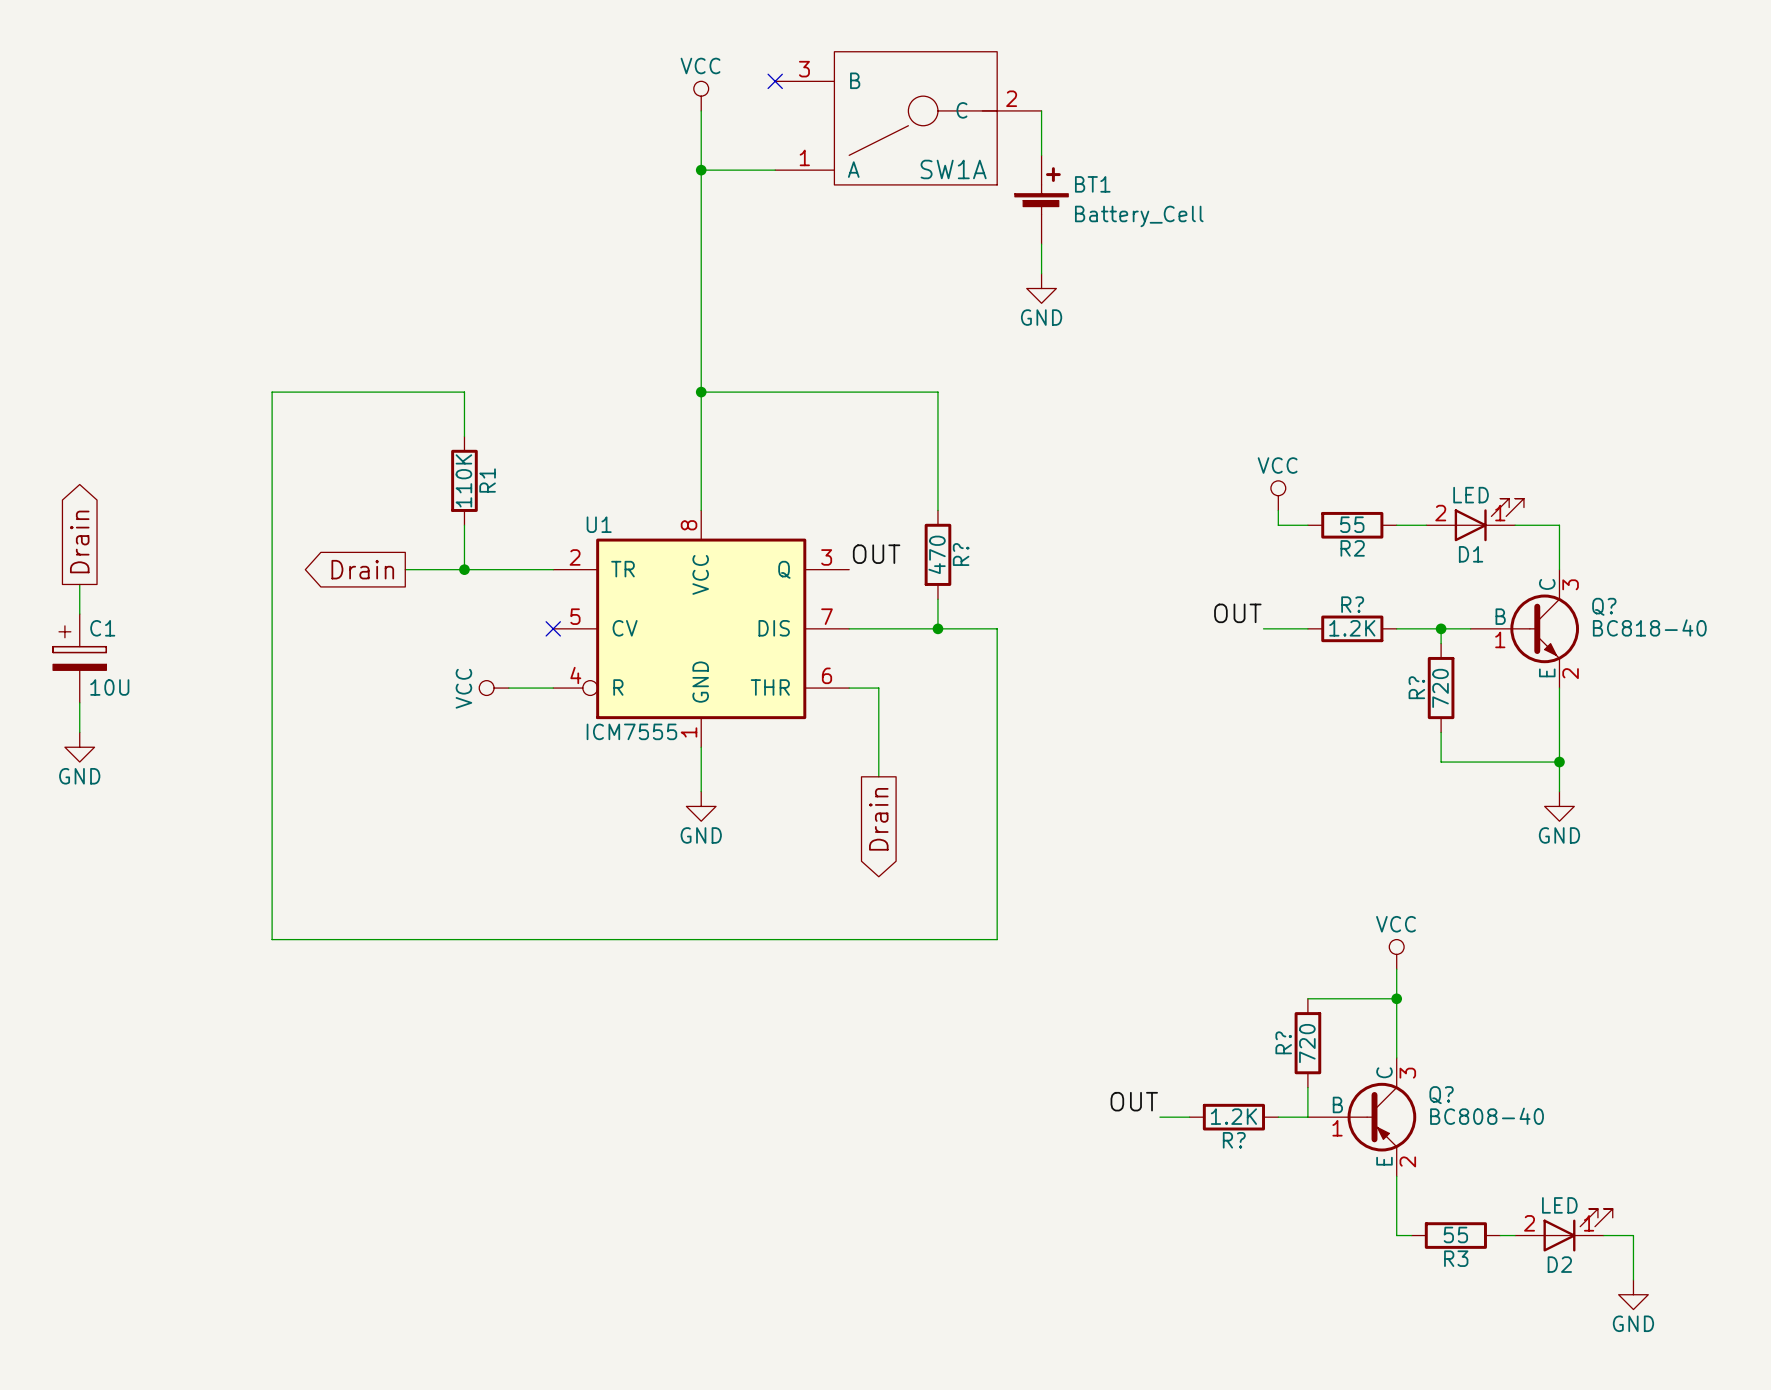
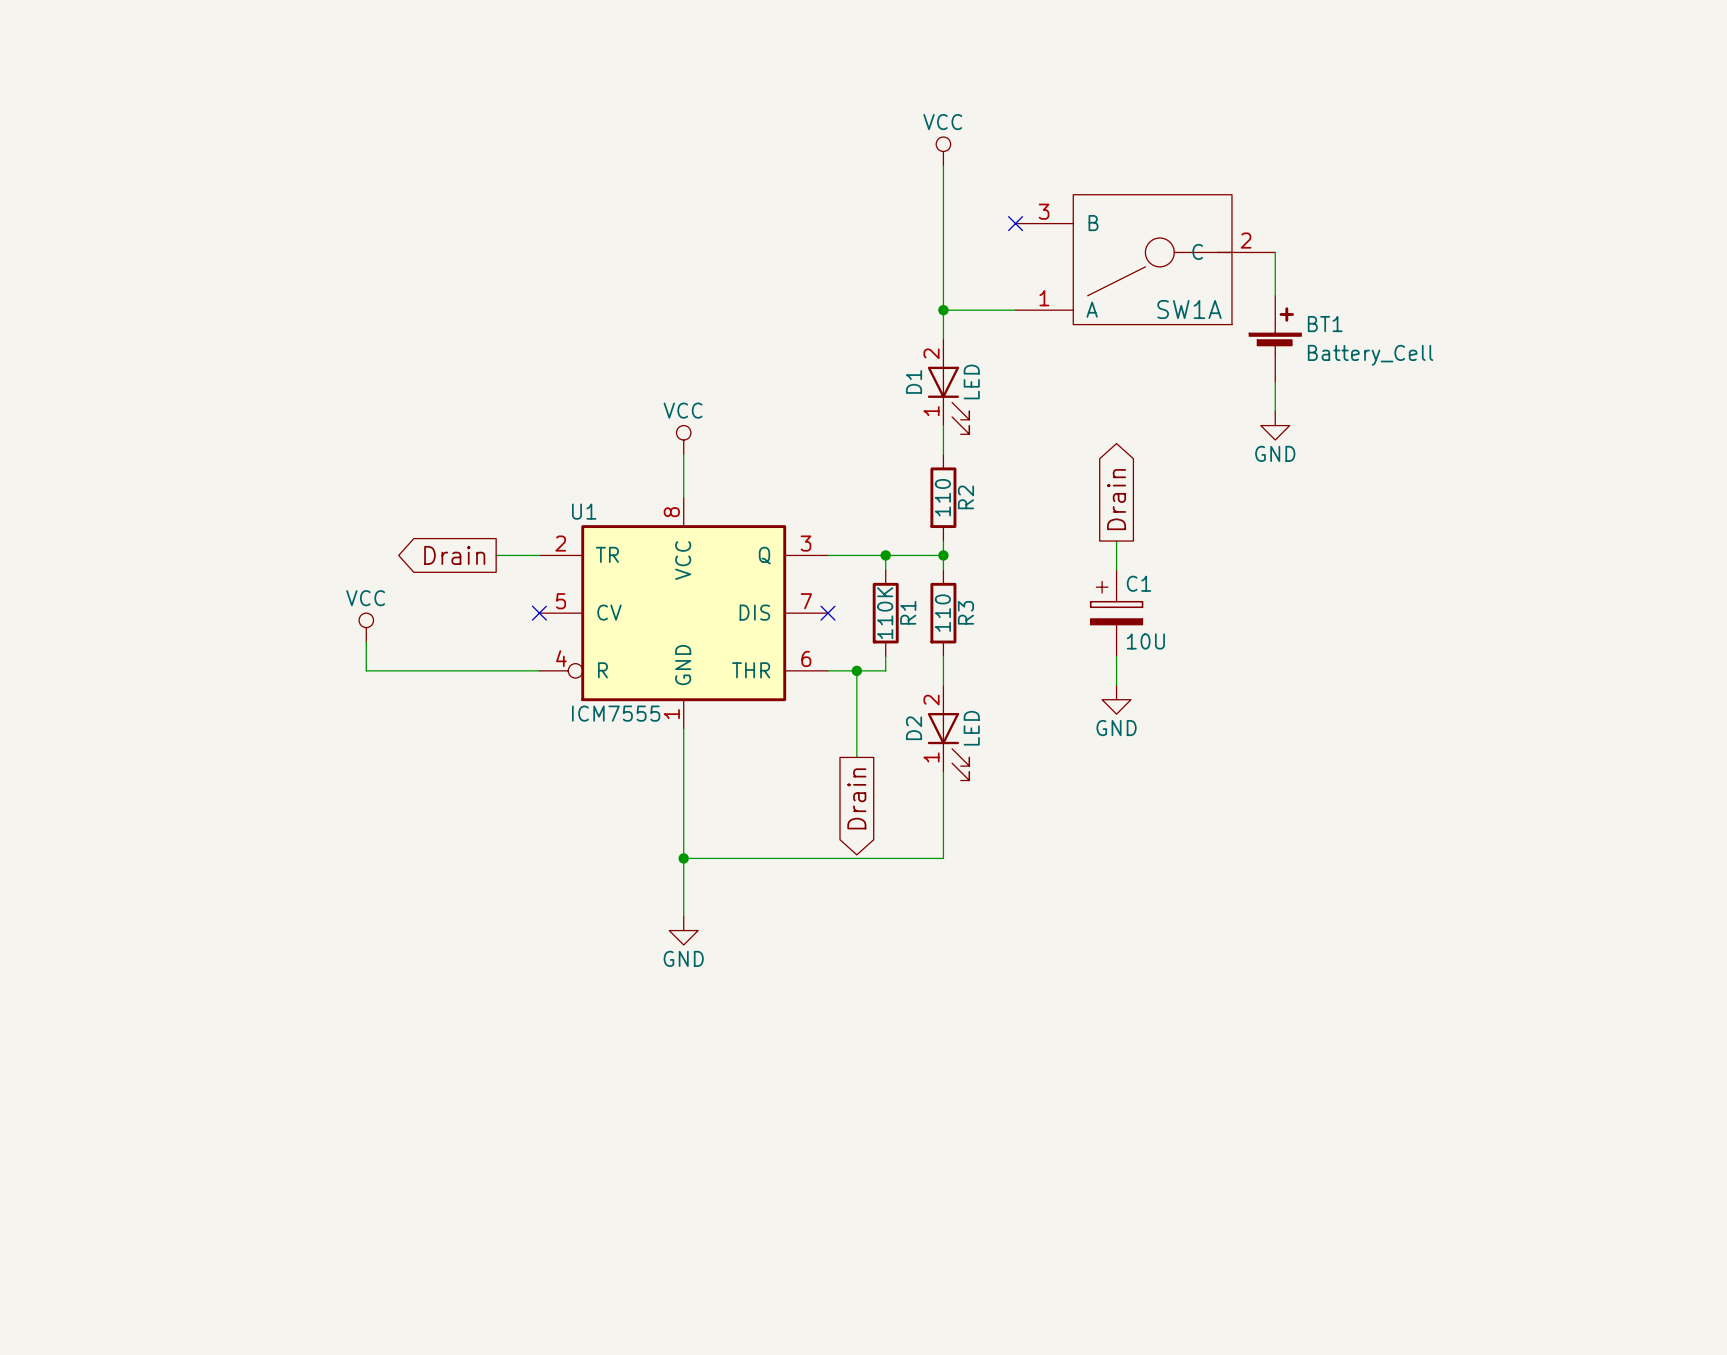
no-connect mark: (775, 81) -> none
power symbol: VCC (701, 96) -> none
wire: (701, 110) (701, 466) -> none
wire: (1041, 110) (1041, 155) -> none
SW1A position: (908, 118) -> (1145, 259)
power symbol: none -> VCC (943, 151)
wire: (701, 170) (775, 170) -> none
junction: (701, 170) -> none
wire: none -> (943, 165) (943, 339)
BT1 position: (1041, 199) -> (1275, 339)
no-connect mark: none -> (1015, 223)
wire: (1041, 244) (1041, 273) -> (943, 425) (943, 454)
wire: none -> (1275, 252) (1275, 295)
power symbol: GND (1041, 288) -> none
wire: none -> (943, 310) (1015, 310)
junction: none -> (943, 310)
wire: (701, 392) (937, 392) (937, 510) -> none
junction: (701, 392) -> none
wire: none -> (1275, 382) (1275, 411)
wire: (464, 436) (464, 392) (272, 392) (272, 939) (997, 939) (997, 628) (849, 628) -> none
power symbol: none -> GND (1275, 425)
power symbol: none -> VCC (683, 440)
R1 position: (464, 480) -> (885, 613)
power symbol: VCC (1278, 495) -> none
wire: (1278, 510) (1278, 525) (1307, 525) -> none
global label: none -> Drain (1116, 499)
D1 position: (1475, 519) -> (948, 386)
D1 rotation: 0° (1489, 519) -> 90° clockwise (948, 400)
R2 value: 55 (1352, 524) -> 110 (942, 497)
wire: (464, 525) (464, 569) -> none
R2 rotation: 0° (1352, 525) -> 90° clockwise (943, 497)
R2 position: (1352, 525) -> (943, 497)
wire: (1396, 525) (1426, 525) -> none
wire: (1515, 525) (1559, 525) (1559, 569) -> none
global label: Drain (79, 541) -> none
R2 name position: R2 (1352, 548) -> R2 (965, 497)
label: OUT (876, 554) -> none
R?: 470 (937, 554) -> none
wire: none -> (1116, 541) (1116, 569)
global label position: Drain (362, 569) -> Drain (454, 555)
wire: (405, 569) (508, 569) -> none
junction: (464, 569) -> none
wire: none -> (827, 555) (943, 555)
wire: none -> (885, 555) (885, 569)
junction: none -> (885, 555)
junction: none -> (943, 555)
wire: (79, 584) (79, 614) -> none
wire: (937, 599) (937, 628) -> (943, 541) (943, 569)
label: OUT (1237, 613) -> none
no-connect mark: none -> (827, 613)
junction: (937, 628) -> none
wire: (1263, 628) (1307, 628) -> none
R?: 1.2K (1352, 628) -> none
wire: (1396, 628) (1470, 628) -> none
wire: (1441, 628) (1441, 643) -> none
junction: (1441, 628) -> none
Q?: BC818-40 (1524, 628) -> none
C1 position: (79, 658) -> (1116, 613)
wire: none -> (366, 642) (366, 670) (496, 670)
wire: none -> (885, 656) (885, 670) (856, 670)
wire: none -> (943, 656) (943, 685)
wire: none -> (1116, 656) (1116, 685)
power symbol rotation: 0° (494, 688) -> 90° clockwise (366, 627)
power symbol position: VCC (494, 688) -> VCC (366, 627)
junction: none -> (856, 670)
R?: 720 (1441, 688) -> none
wire: (1559, 688) (1559, 791) -> none
wire: (79, 702) (79, 732) -> none
power symbol: none -> GND (1116, 699)
wire: (1441, 732) (1441, 762) (1559, 762) -> none
power symbol: GND (79, 747) -> none
junction: (1559, 762) -> none
wire: none -> (683, 771) (683, 916)
wire: none -> (943, 771) (943, 858) (683, 858)
power symbol position: GND (701, 806) -> GND (683, 930)
power symbol: GND (1559, 806) -> none
junction: none -> (683, 858)
power symbol: VCC (1396, 954) -> none
wire: (1396, 969) (1396, 1057) -> none
wire: (1307, 998) (1396, 998) -> none
junction: (1396, 998) -> none
R?: 720 (1307, 1043) -> none
wire: (1307, 1087) (1307, 1117) (1278, 1117) -> none
label: OUT (1134, 1101) -> none
wire: (1159, 1117) (1189, 1117) -> none
R?: 1.2K (1233, 1117) -> none
Q?: BC808-40 (1362, 1117) -> none
wire: (1396, 1176) (1396, 1235) (1411, 1235) -> none
D2 position: (1563, 1230) -> (948, 732)
D2 rotation: 0° (1578, 1230) -> 90° clockwise (948, 746)
R3 value: 55 (1455, 1234) -> 110 (942, 613)
R3 rotation: 0° (1455, 1235) -> 90° clockwise (943, 613)
R3 position: (1455, 1235) -> (943, 613)
wire: (1500, 1235) (1515, 1235) -> none
wire: (1603, 1235) (1633, 1235) (1633, 1279) -> none
R3 name position: R3 (1456, 1258) -> R3 (965, 612)
power symbol: GND (1633, 1294) -> none

